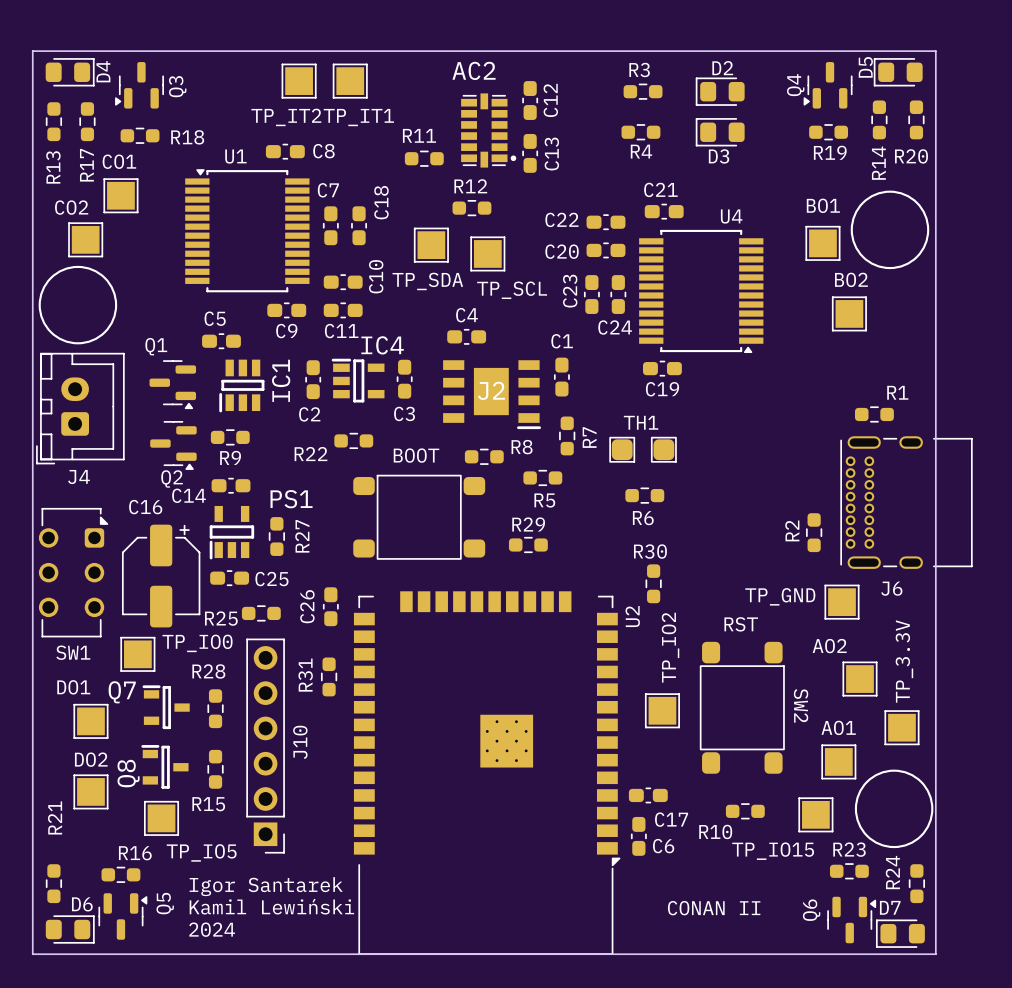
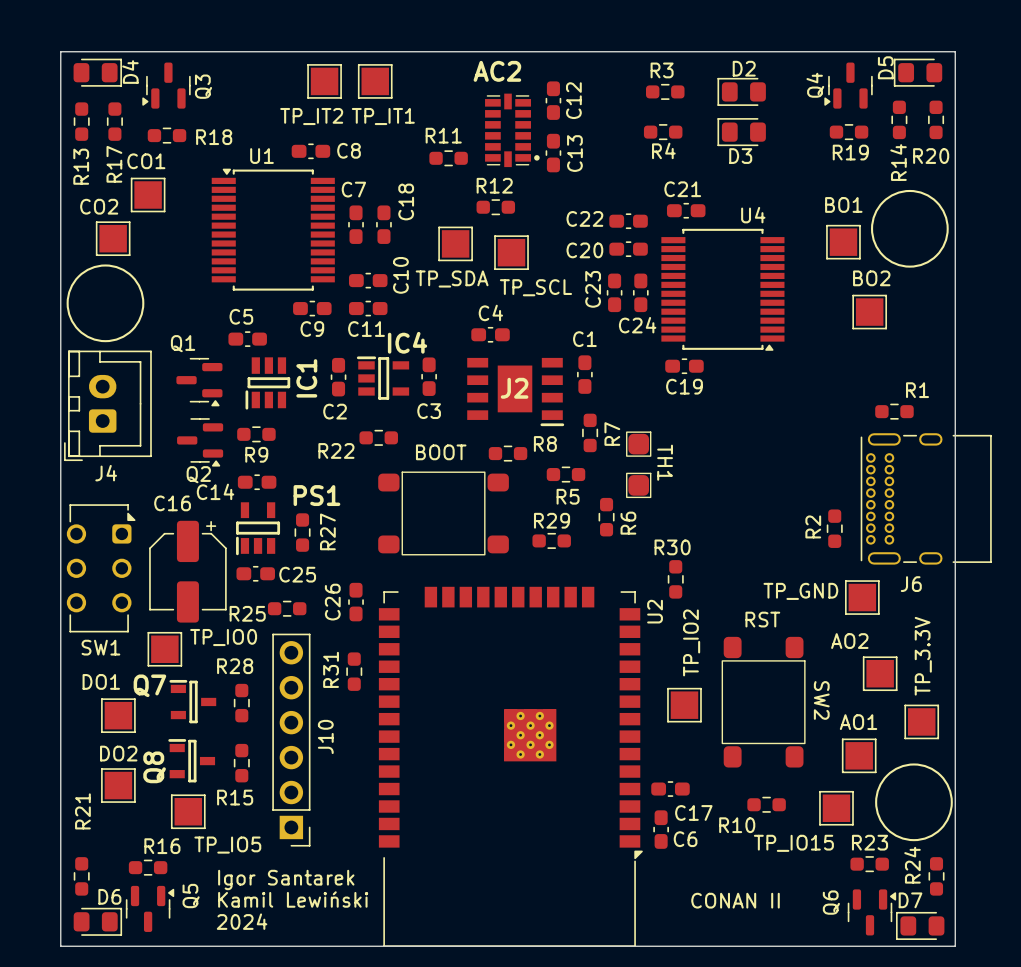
TH1 rotation: 0° (643, 449) -> 90° clockwise (638, 464)
R6 rotation: 0° (644, 495) -> 90° clockwise (606, 517)
R6 position: (644, 495) -> (606, 517)
R6 name position: R6 (643, 518) -> R6 (628, 523)

